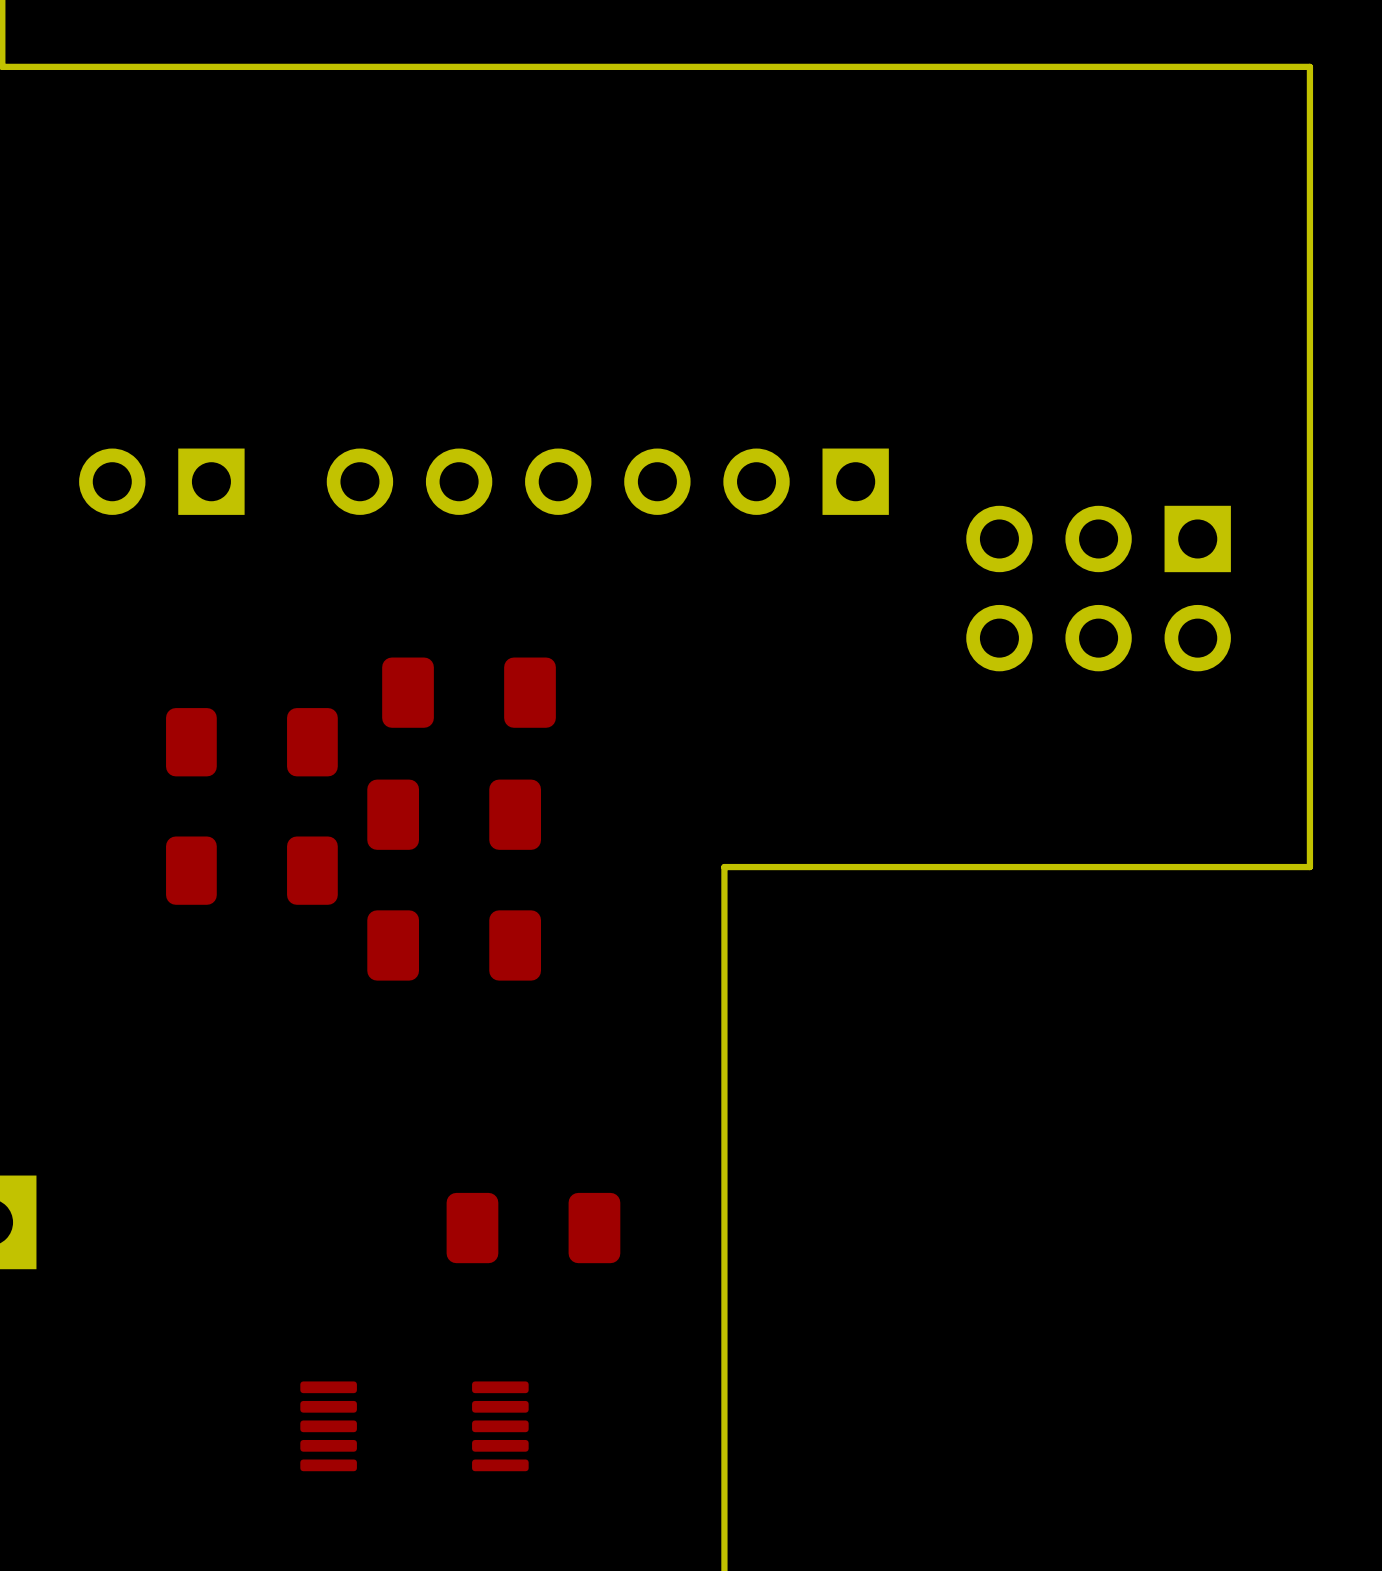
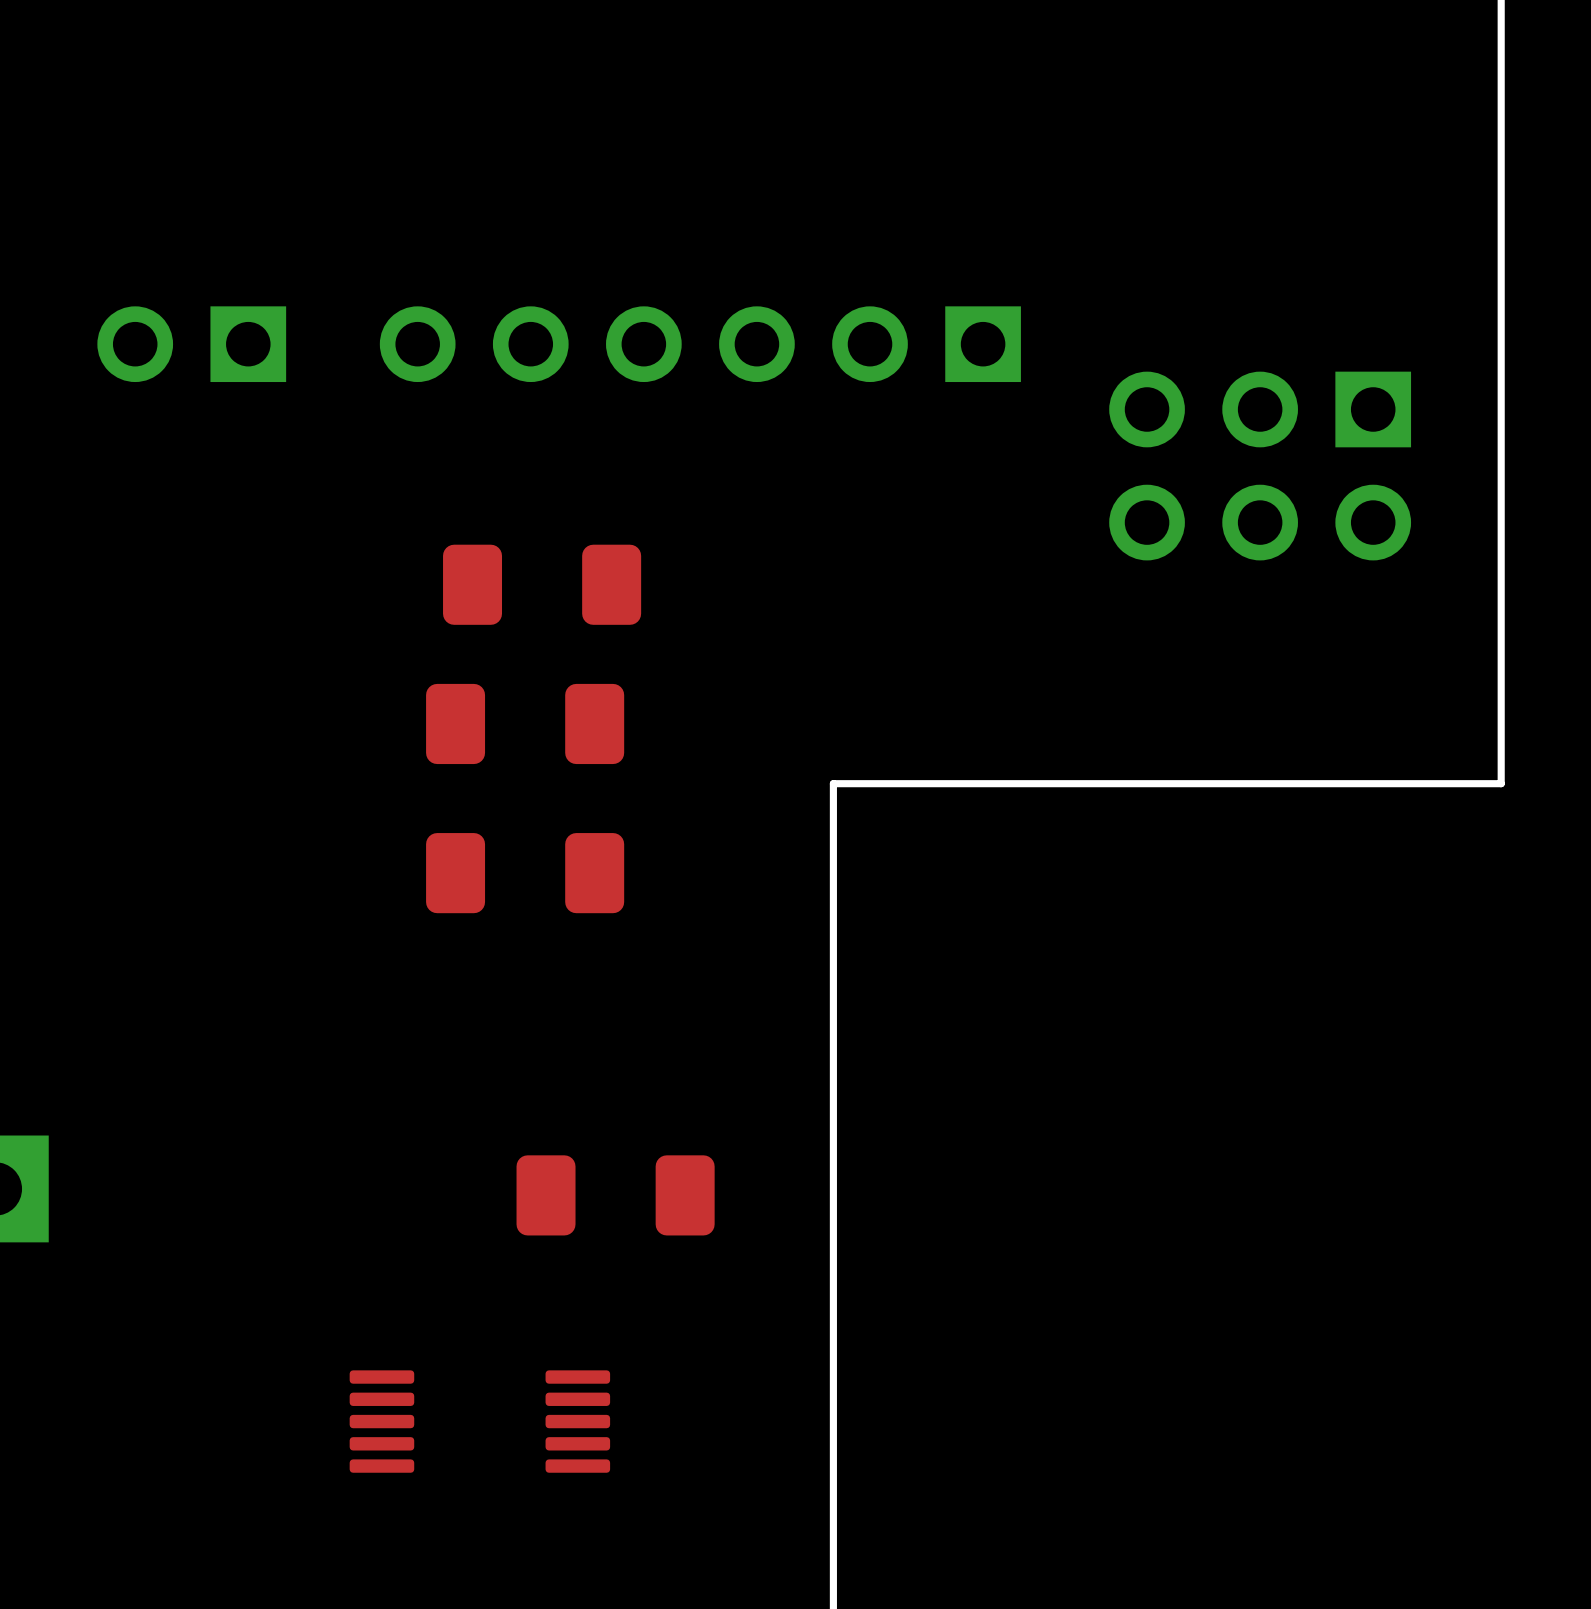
part: (251, 742) -> none
part: (251, 870) -> none

